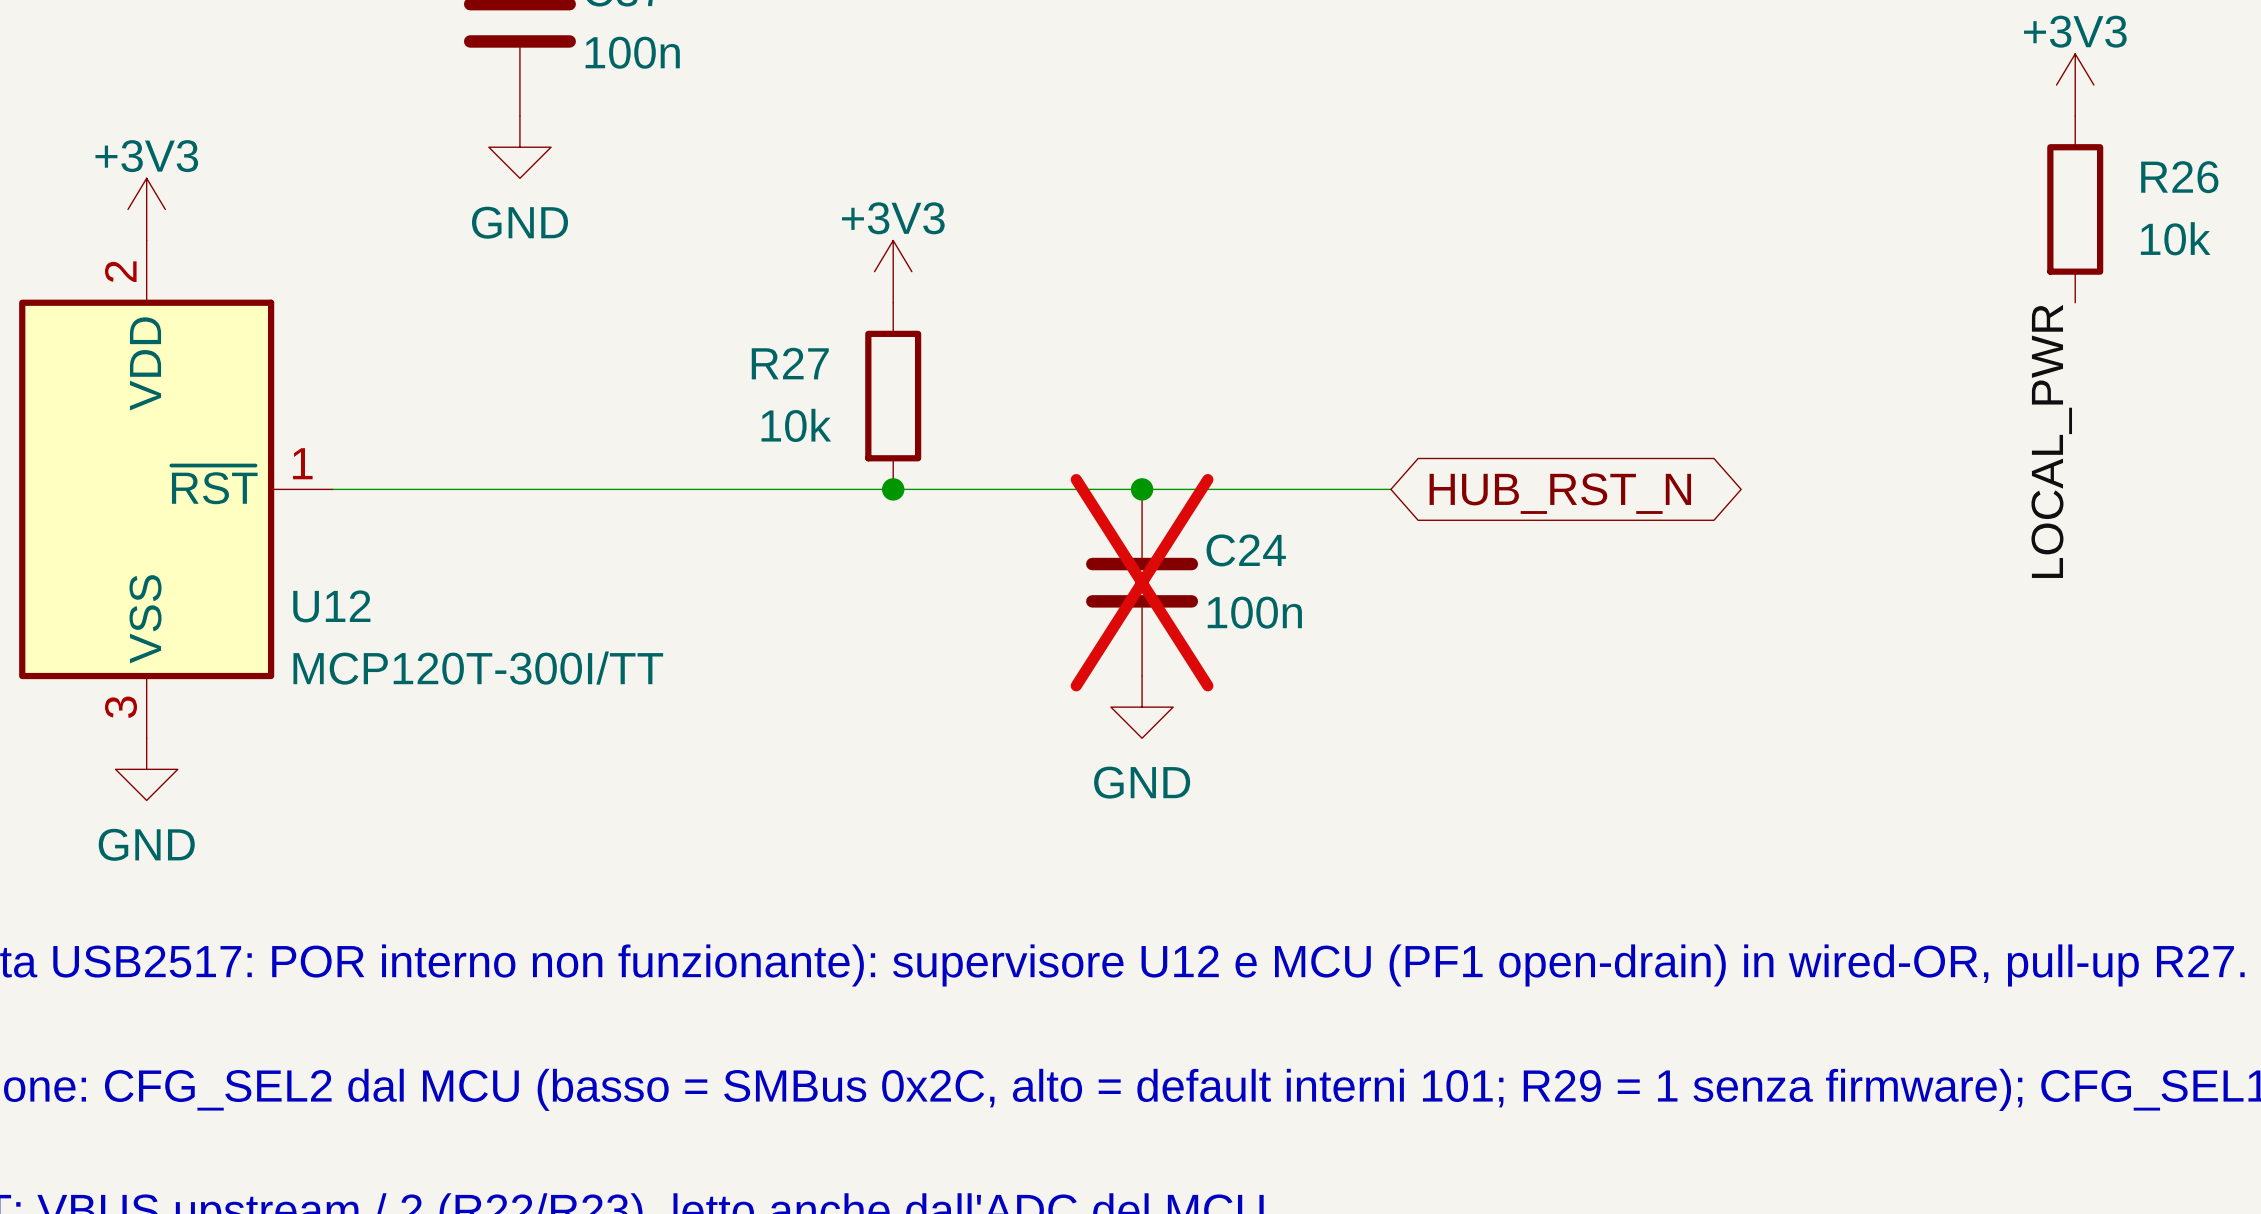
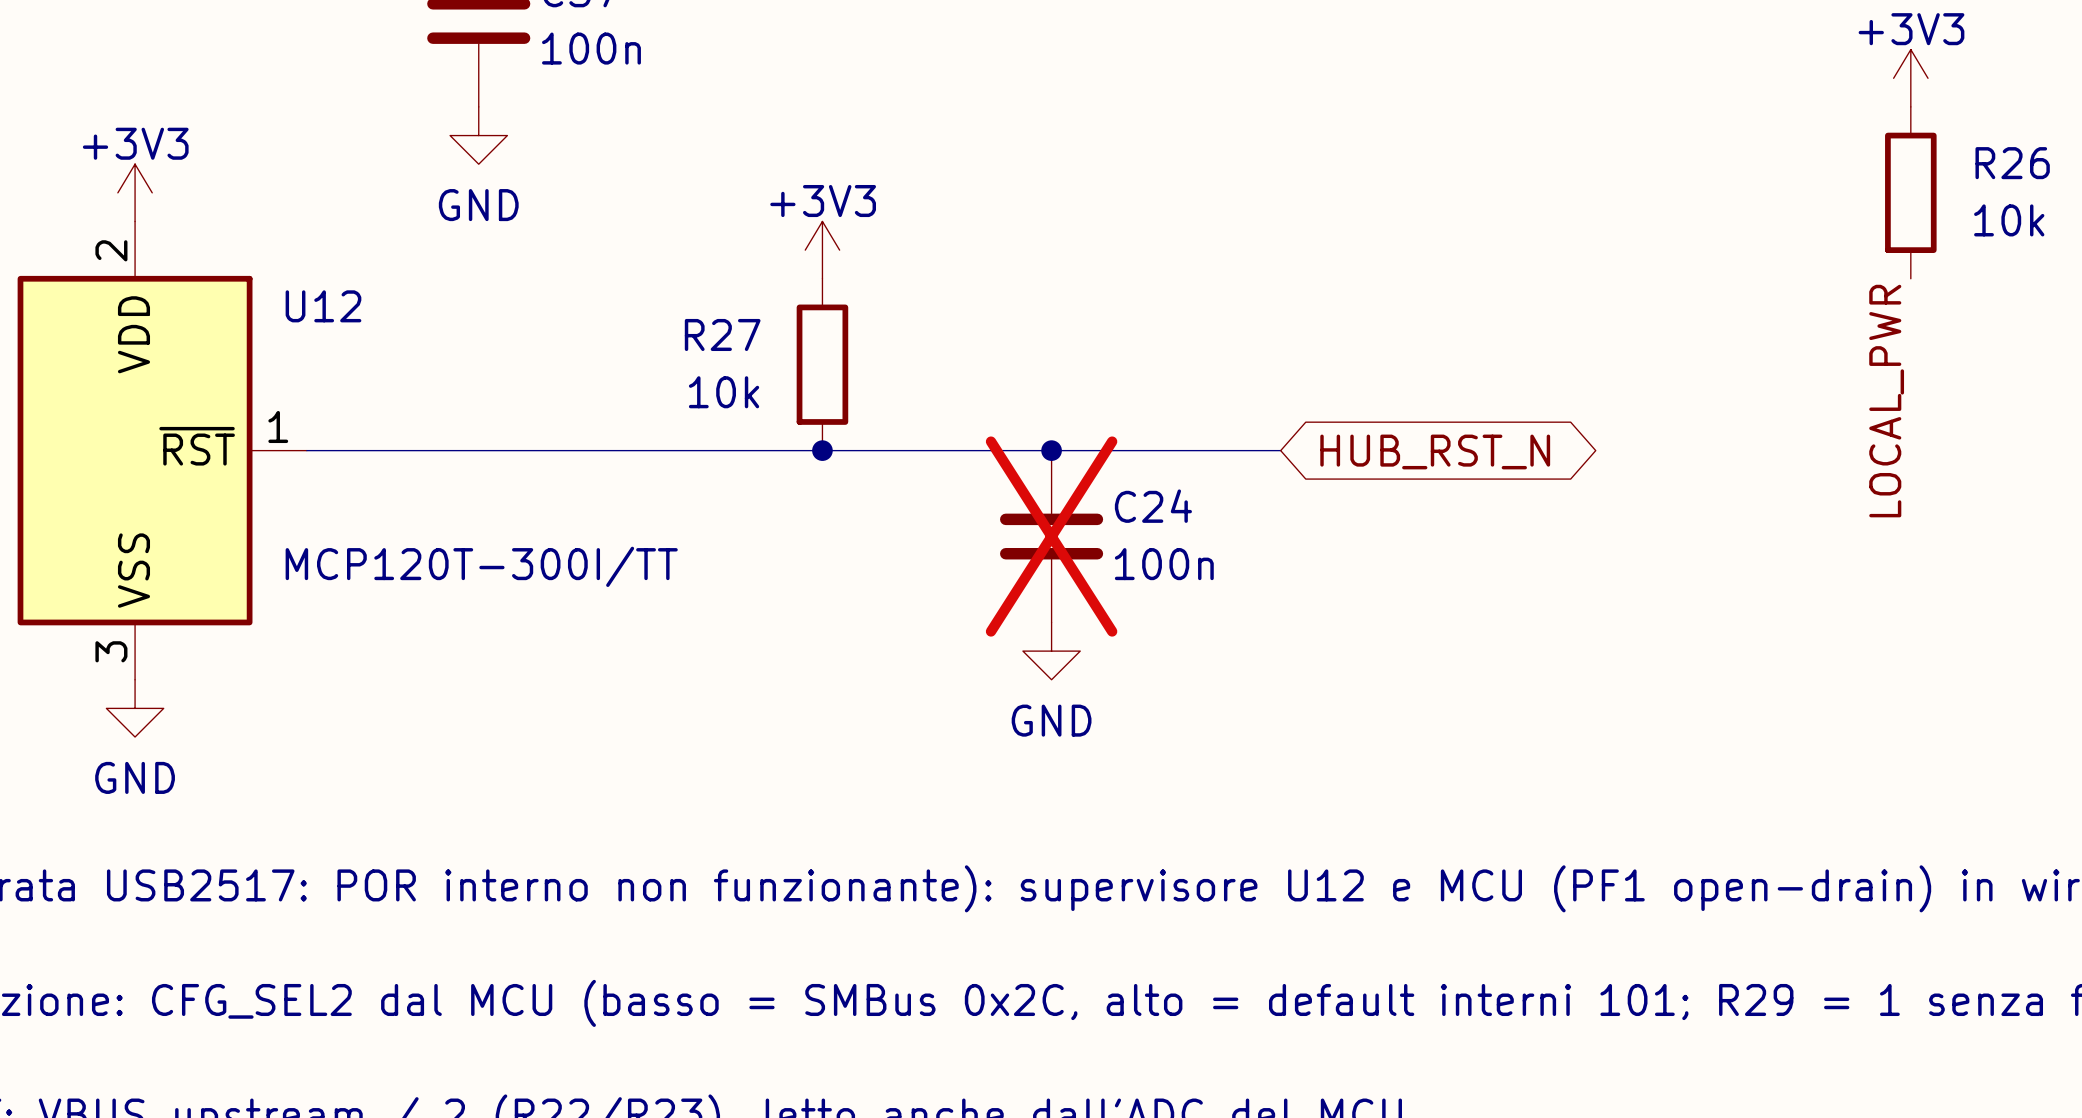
U12 name position: U12 (331, 606) -> U12 (323, 306)
U12 value position: MCP120T-300I/TT (478, 668) -> MCP120T-300I/TT (481, 566)

